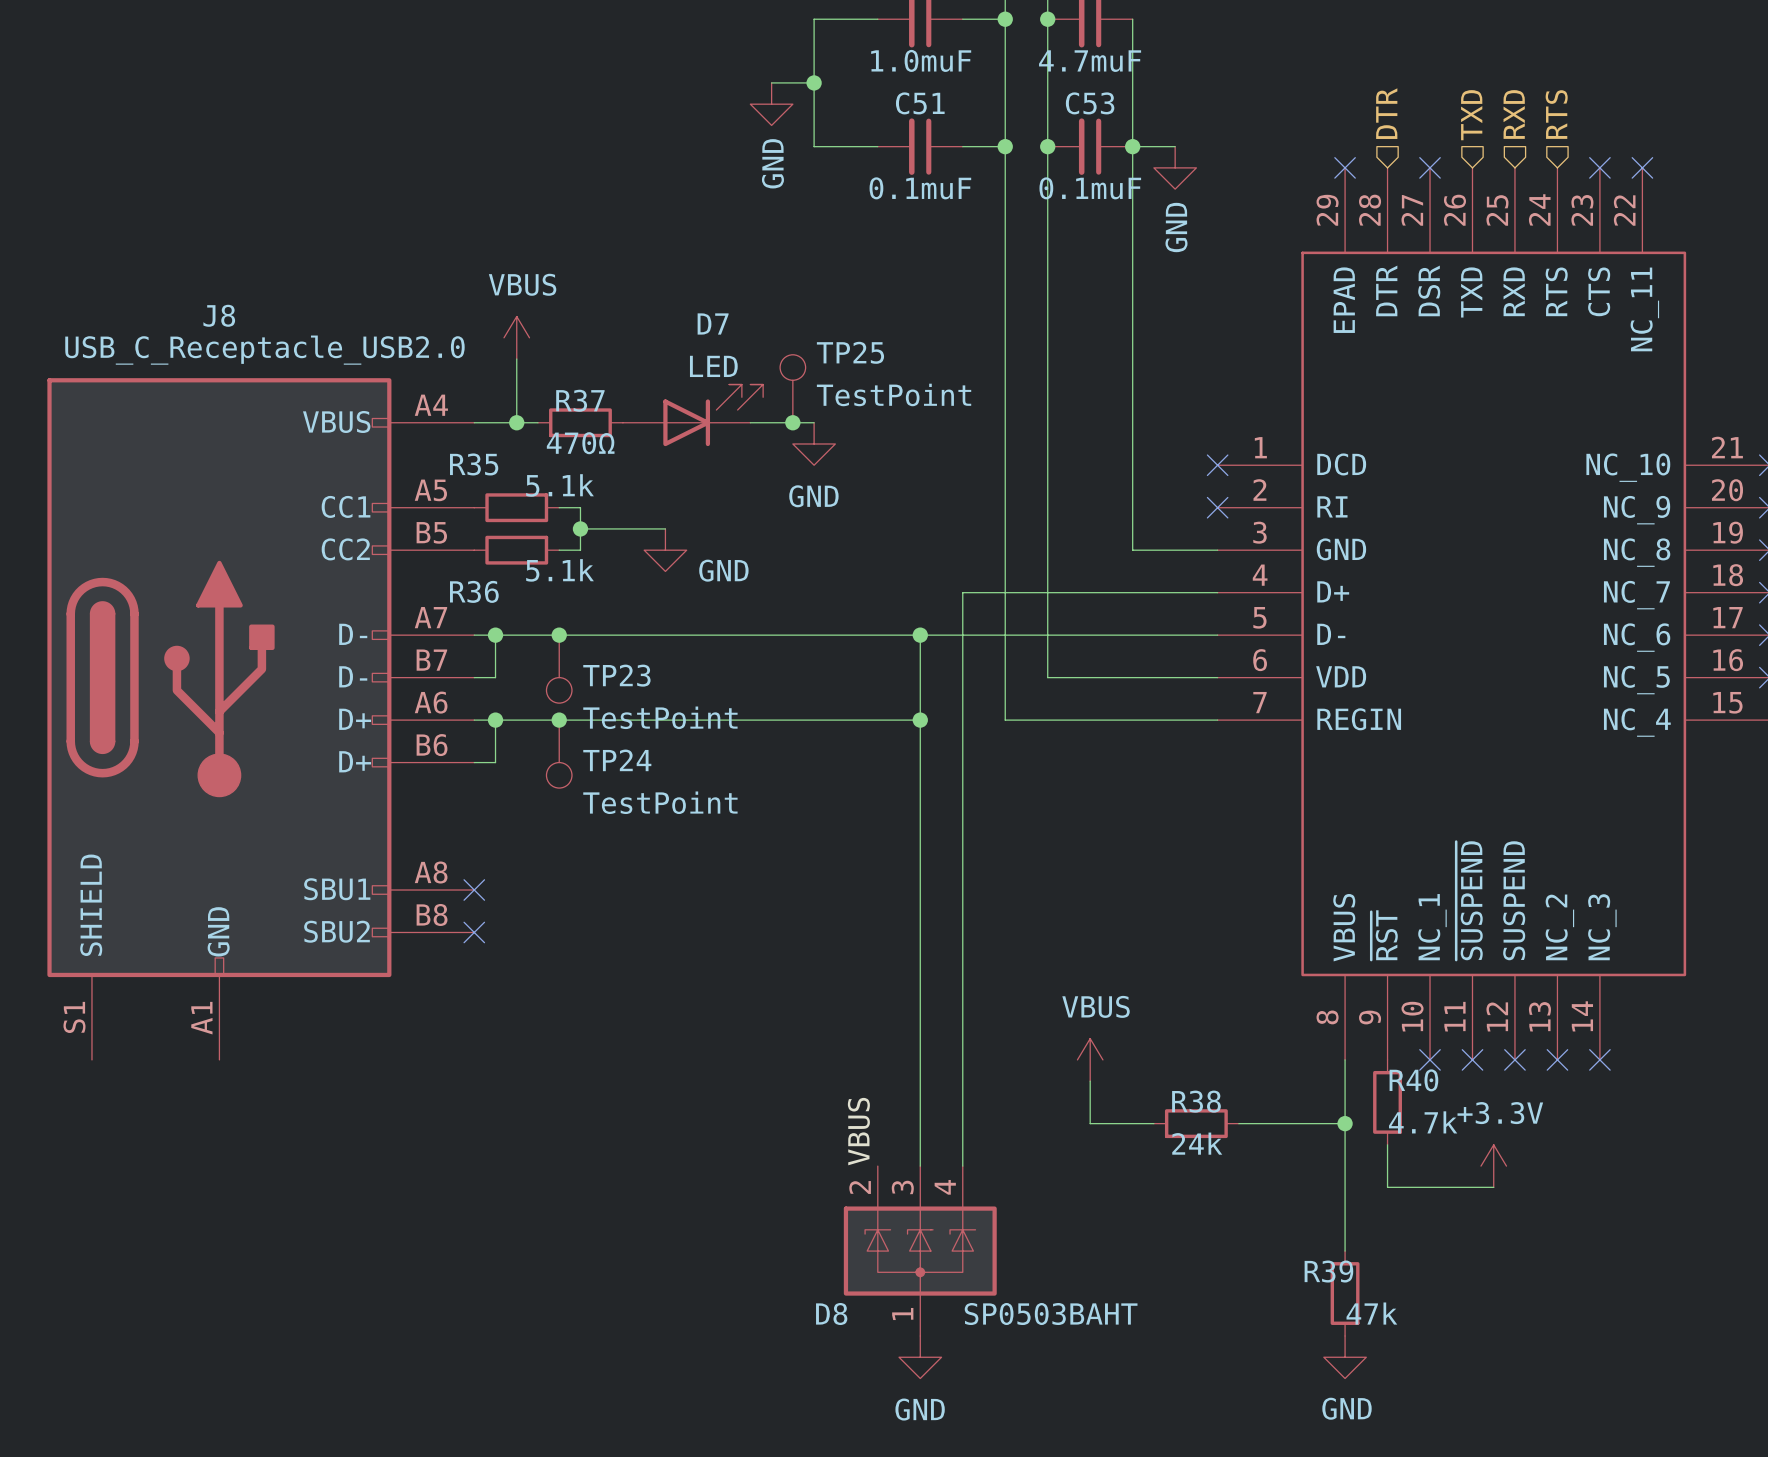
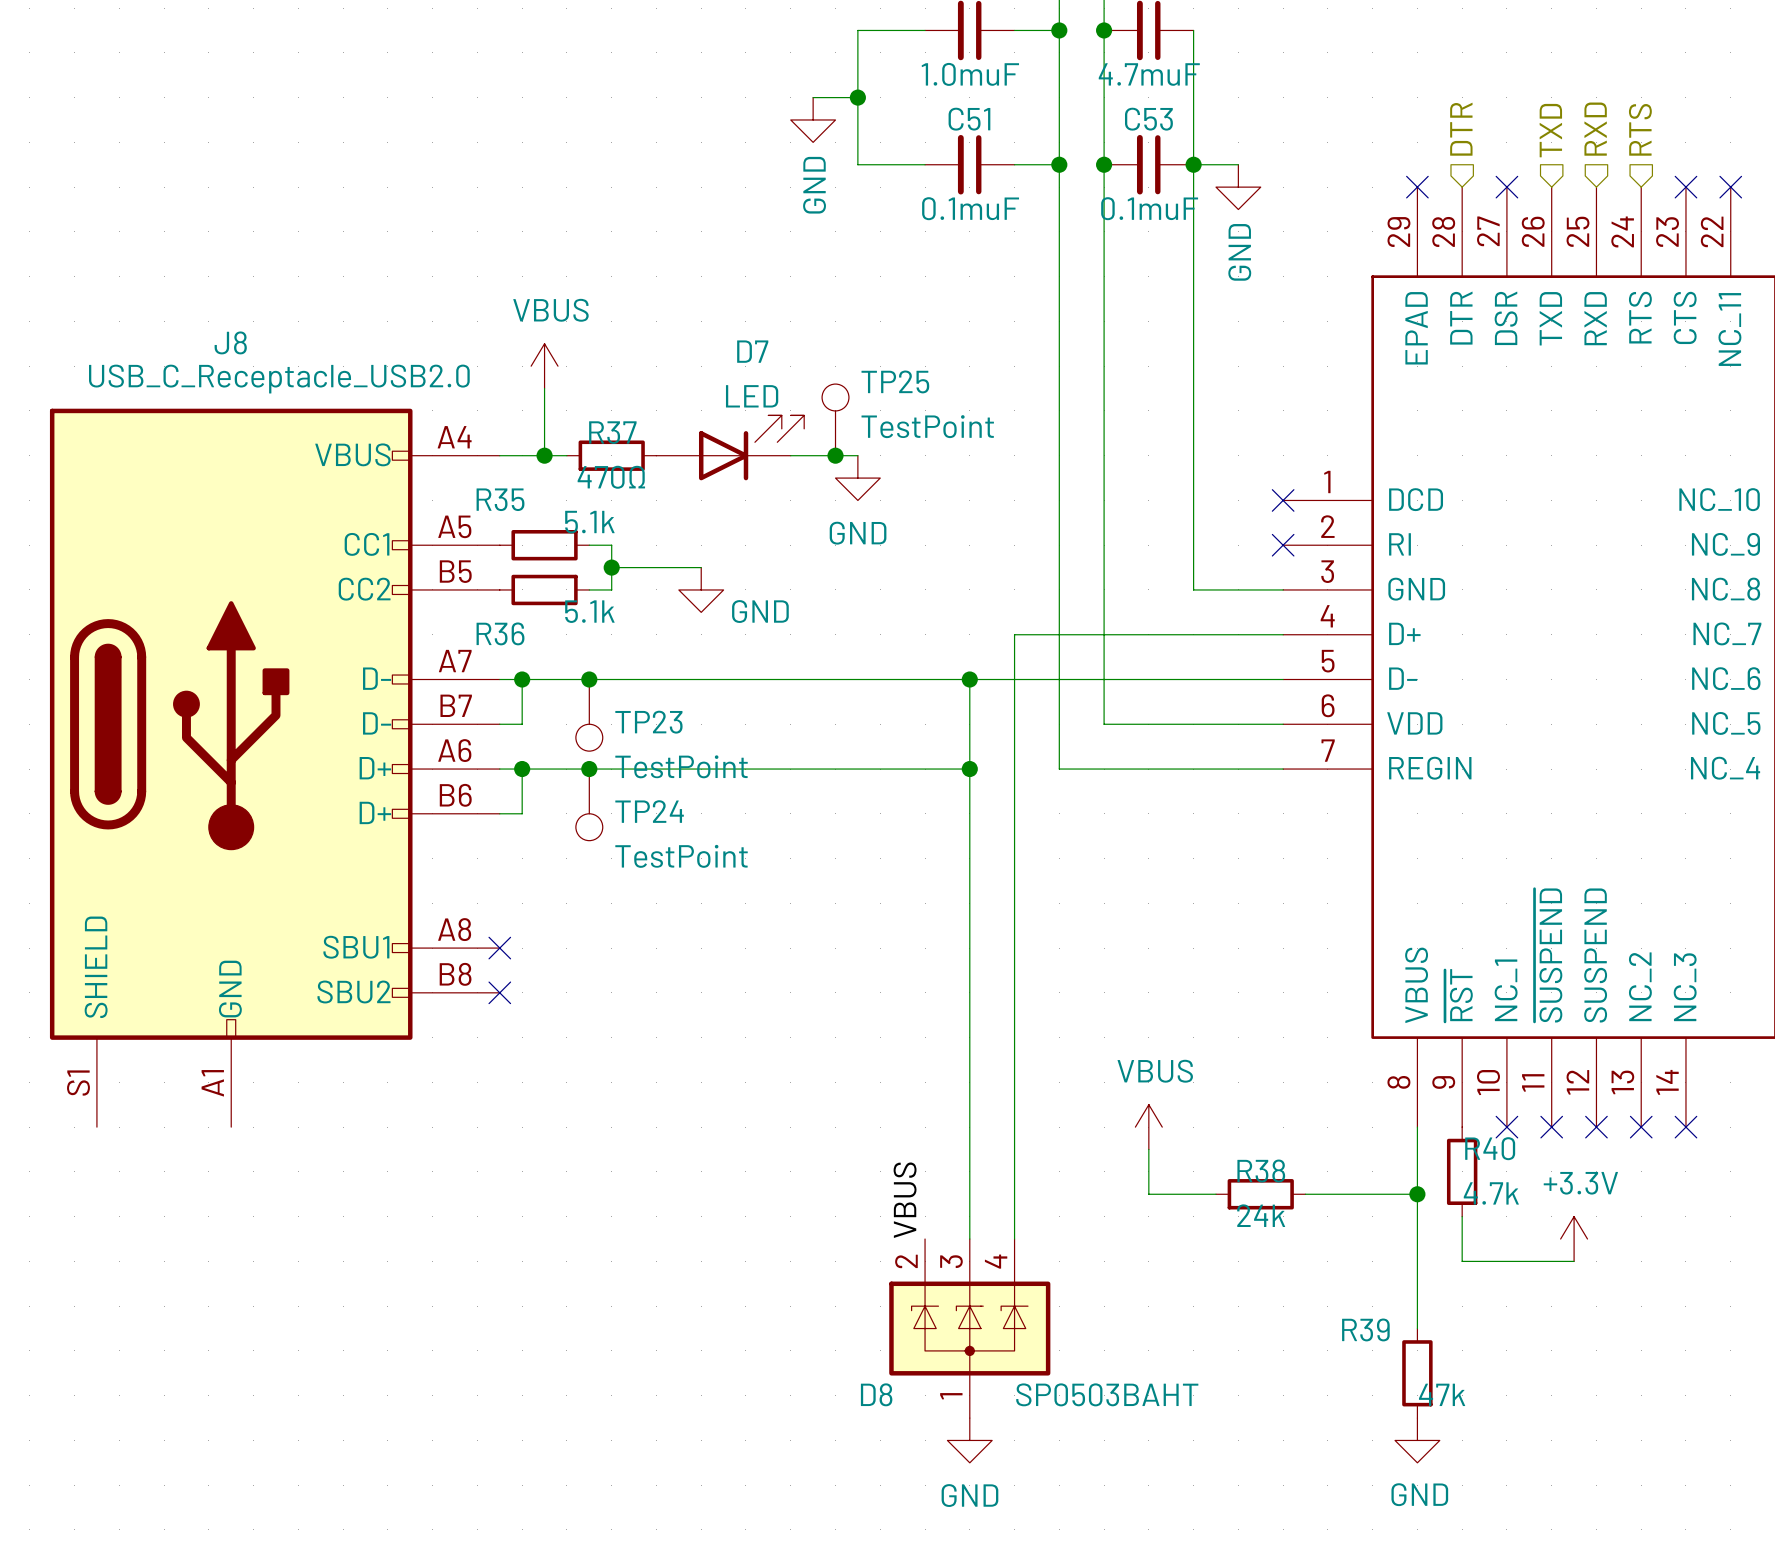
R39 name position: R39 (1328, 1271) -> R39 (1365, 1329)

